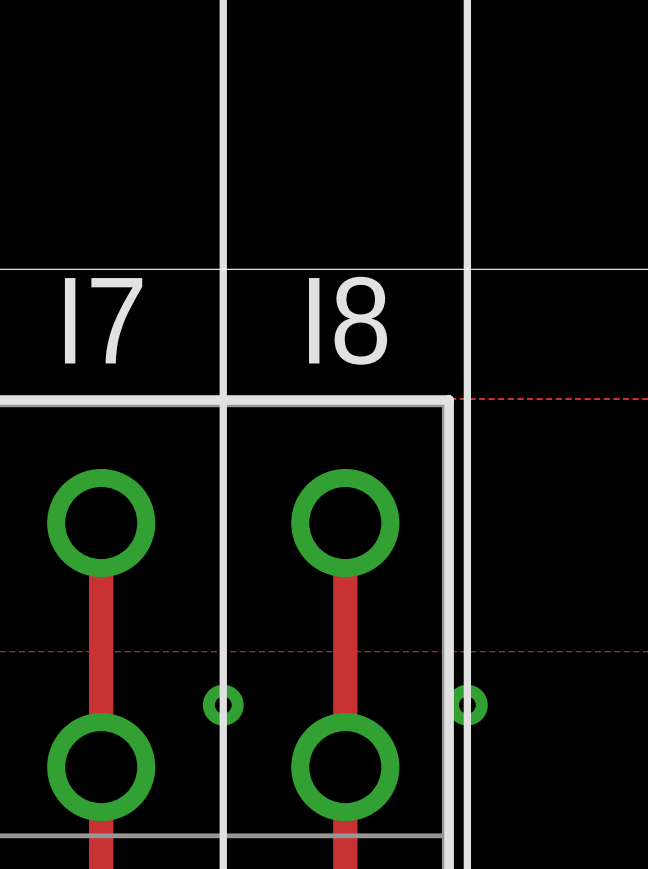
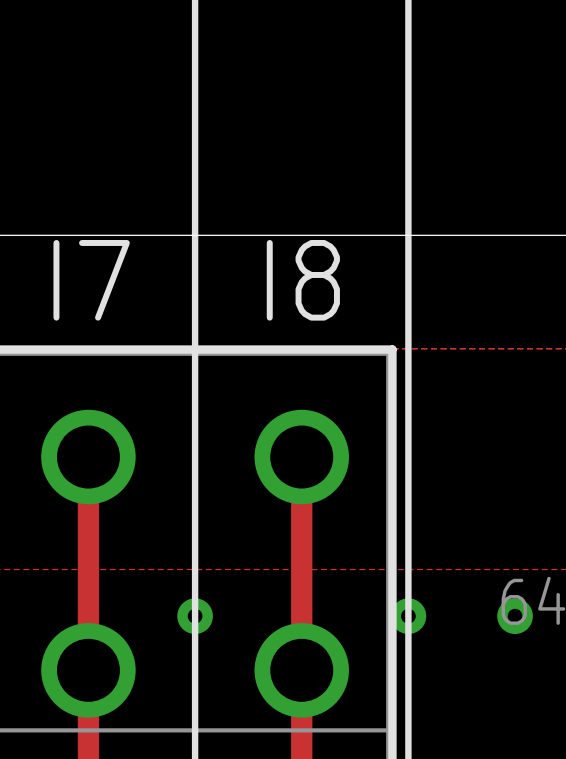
via: none -> (515, 616)

